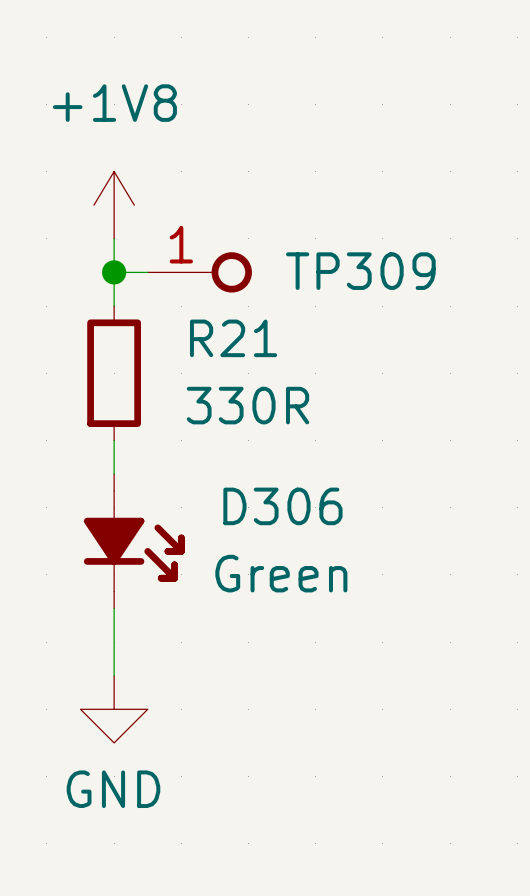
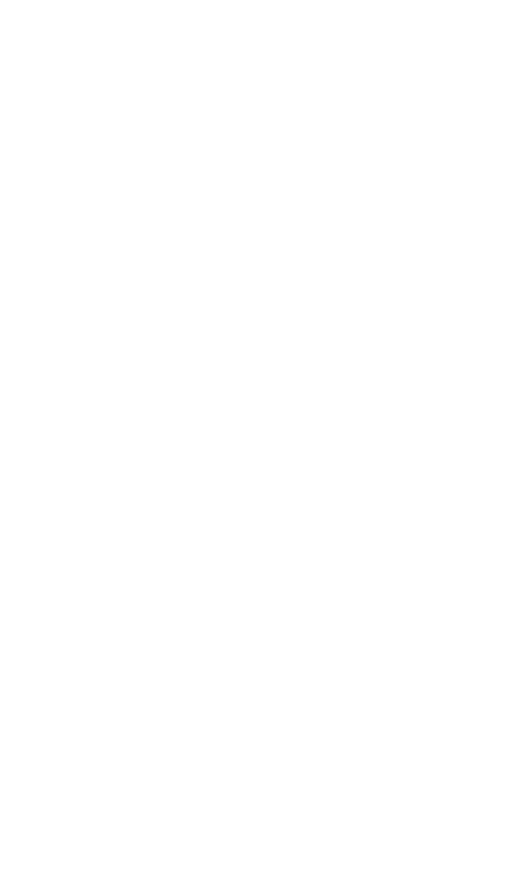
power symbol: +1V8 (114, 205) -> none
wire: (114, 238) (114, 306) -> none
wire: (114, 272) (147, 272) -> none
junction: (114, 272) -> none
TP309: (199, 272) -> none
R21: (114, 373) -> none
wire: (114, 440) (114, 474) -> none
D306: (134, 541) -> none
wire: (114, 608) (114, 675) -> none
power symbol: GND (114, 709) -> none

